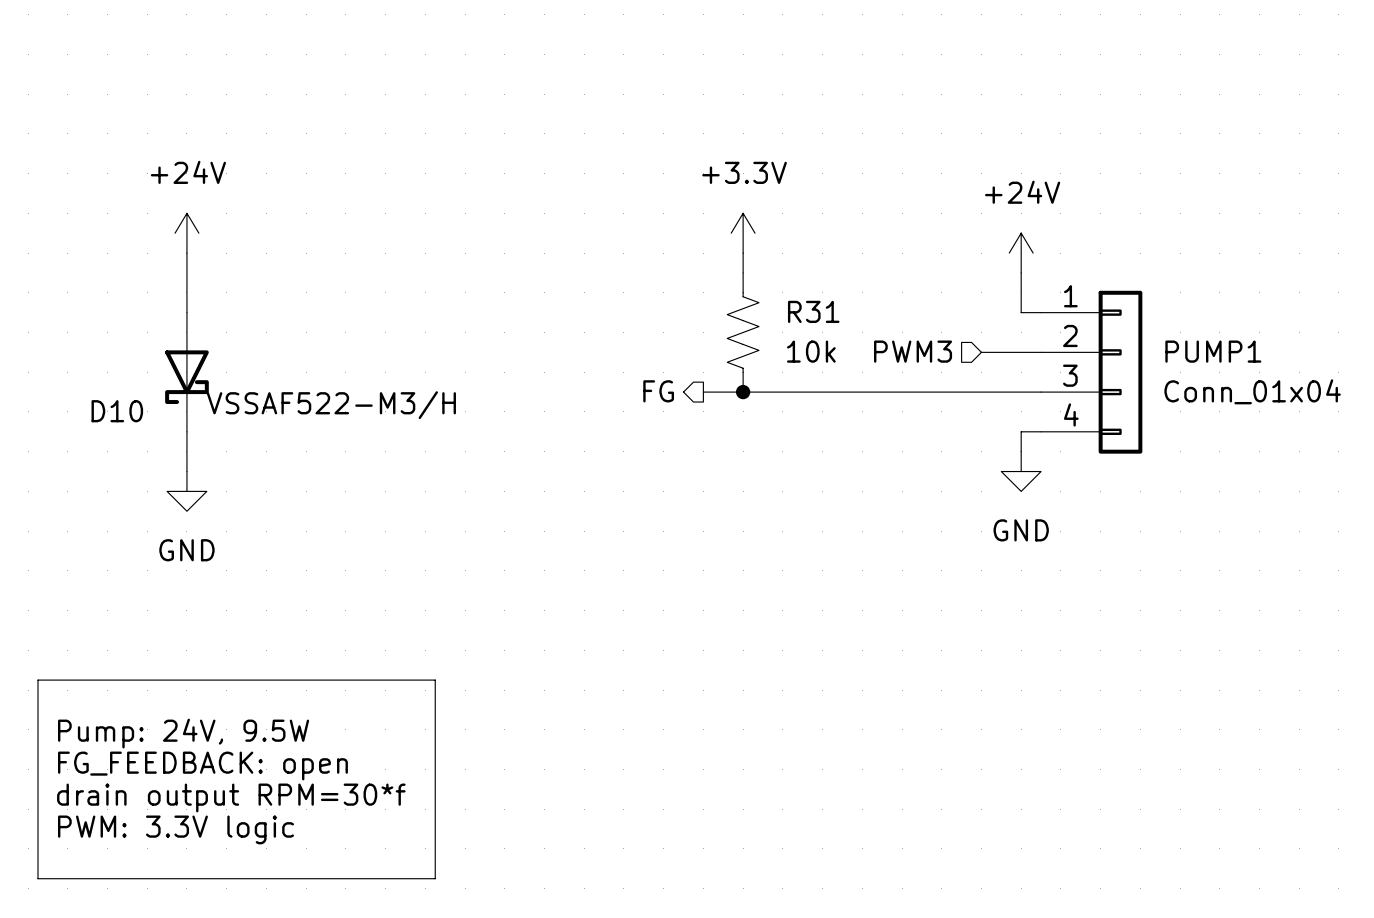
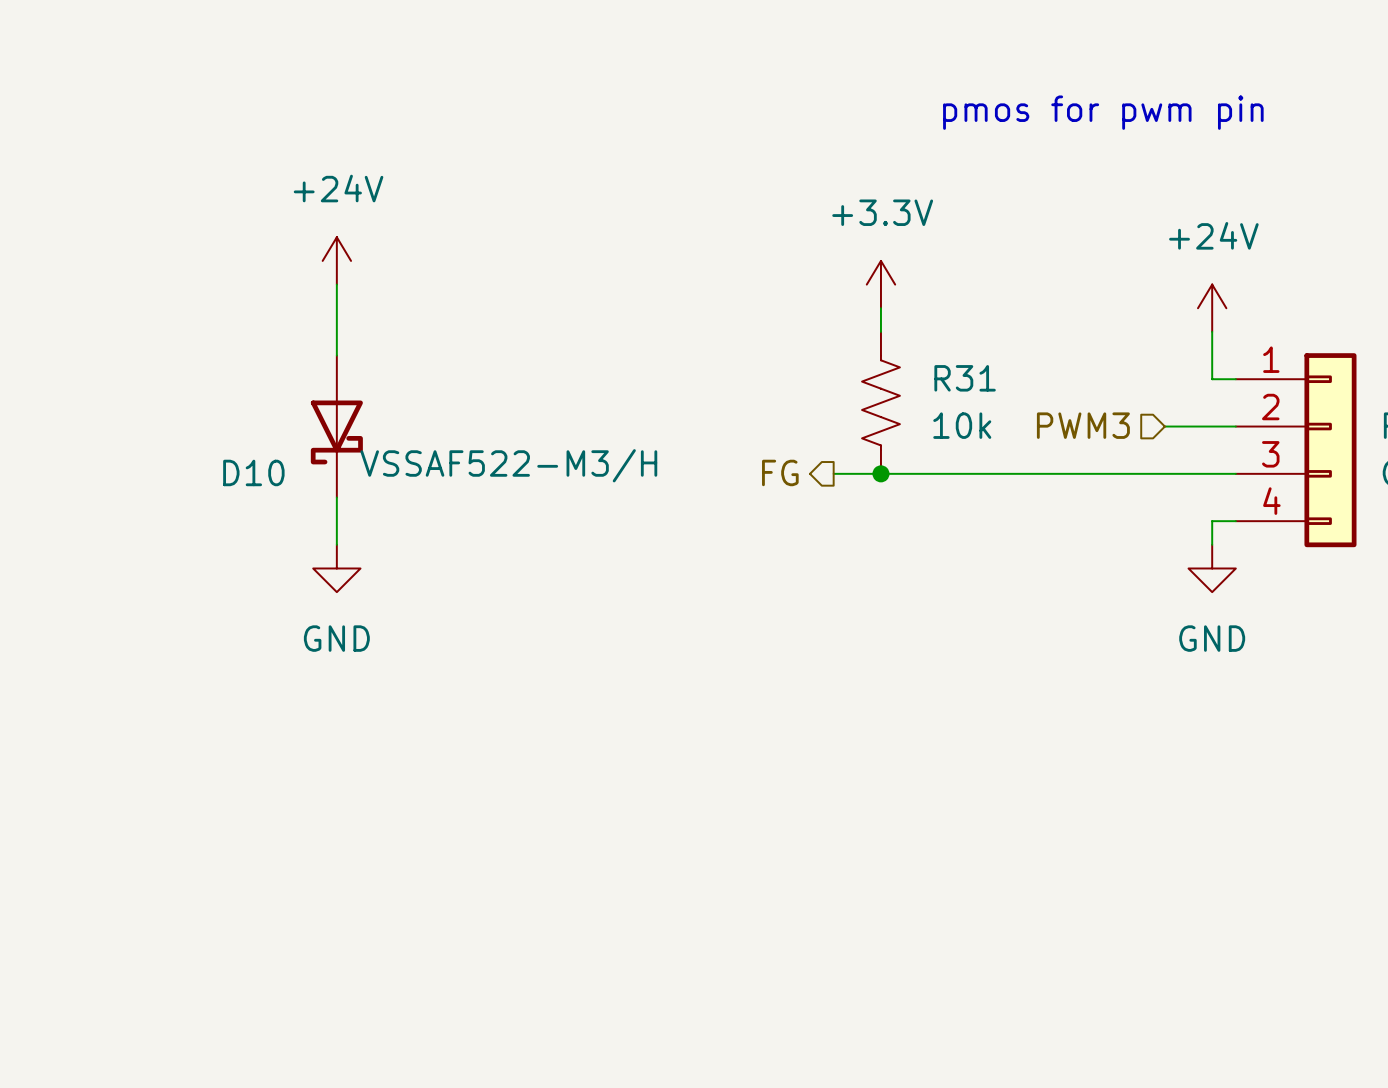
text: none -> pmos for pwm pin (1103, 112)
power symbol position: +24V (186, 233) -> +24V (336, 260)
wire: (186, 253) (186, 312) -> (336, 284) (336, 355)
D10 position: (186, 372) -> (336, 426)
wire: (186, 431) (186, 471) -> (336, 497) (336, 544)
power symbol position: GND (186, 491) -> GND (336, 568)
line: (38, 680) (435, 680) (435, 878) (38, 878) (38, 680) -> none
text: Pump: 24V, 9.5W (183, 733) -> none
text: FG_FEEDBACK: open (202, 765) -> none
text: drain output RPM=30*f (231, 797) -> none
text: PWM: 3.3V logic (176, 829) -> none

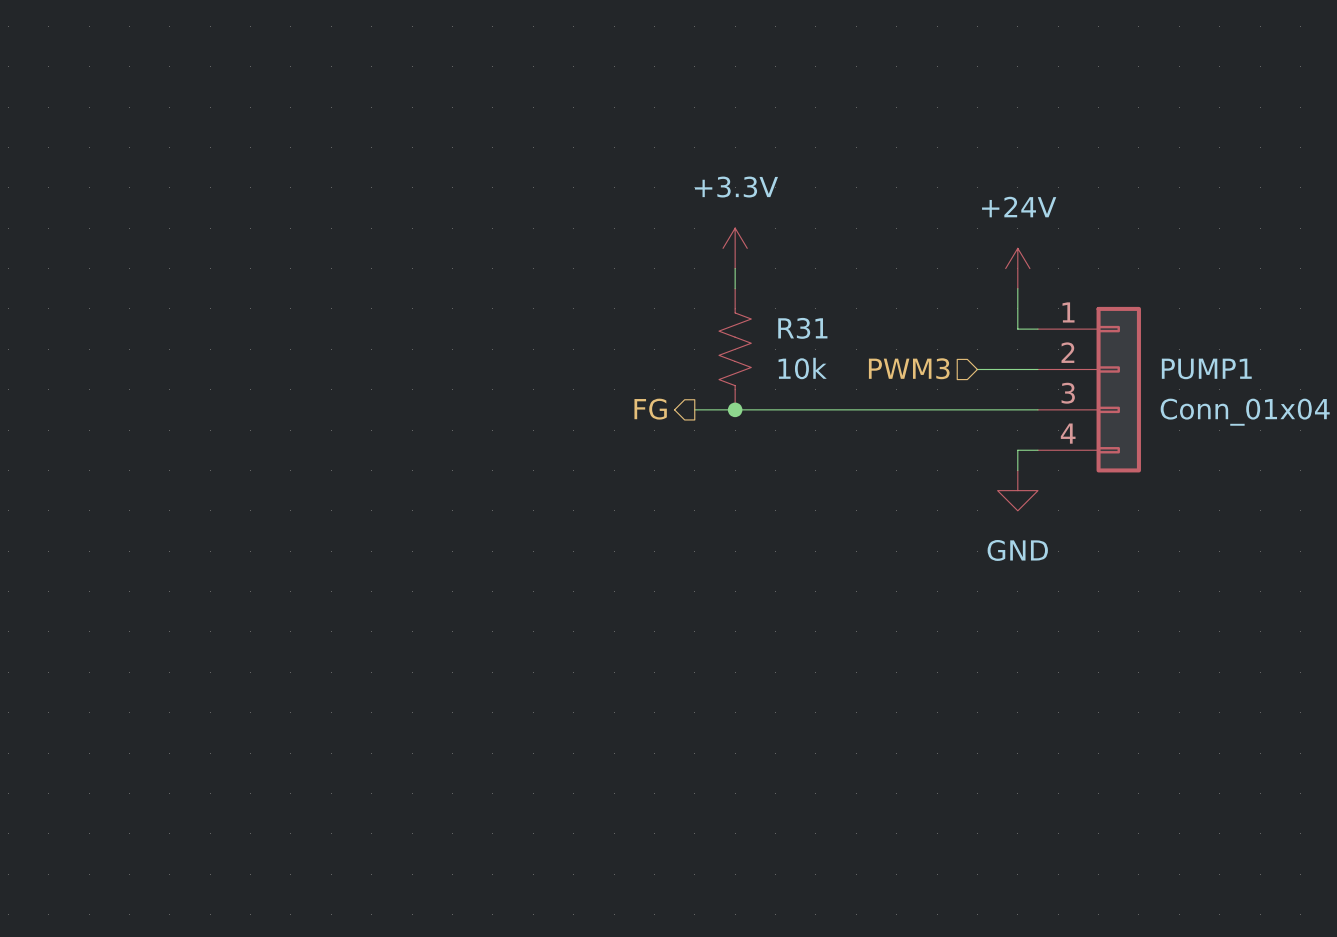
text: pmos for pwm pin (1103, 112) -> none
power symbol: +24V (336, 260) -> none
wire: (336, 284) (336, 355) -> none
D10: VSSAF522-M3/H (336, 426) -> none
wire: (336, 497) (336, 544) -> none
power symbol: GND (336, 568) -> none

